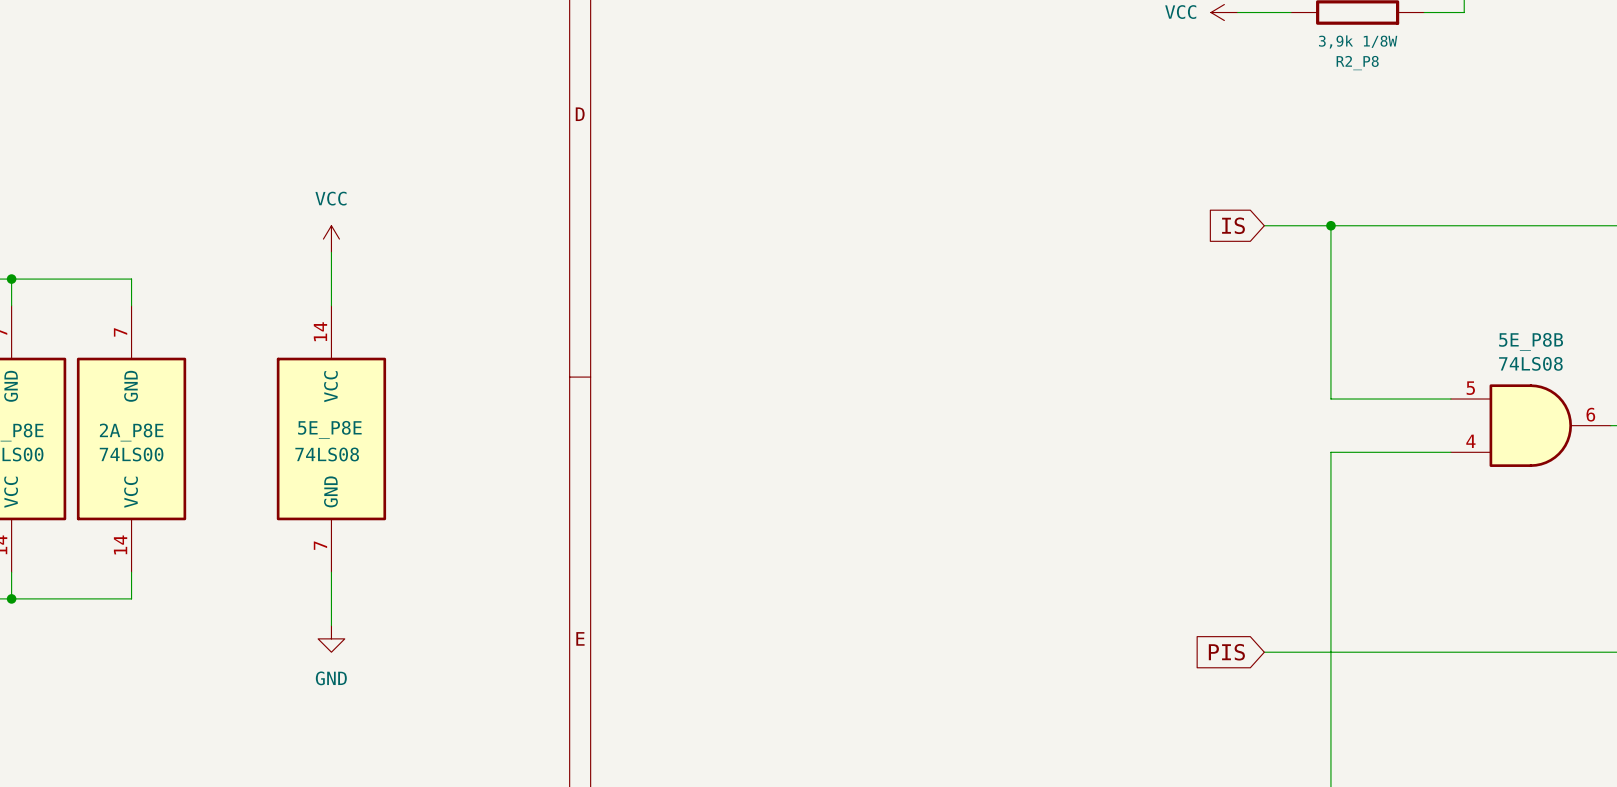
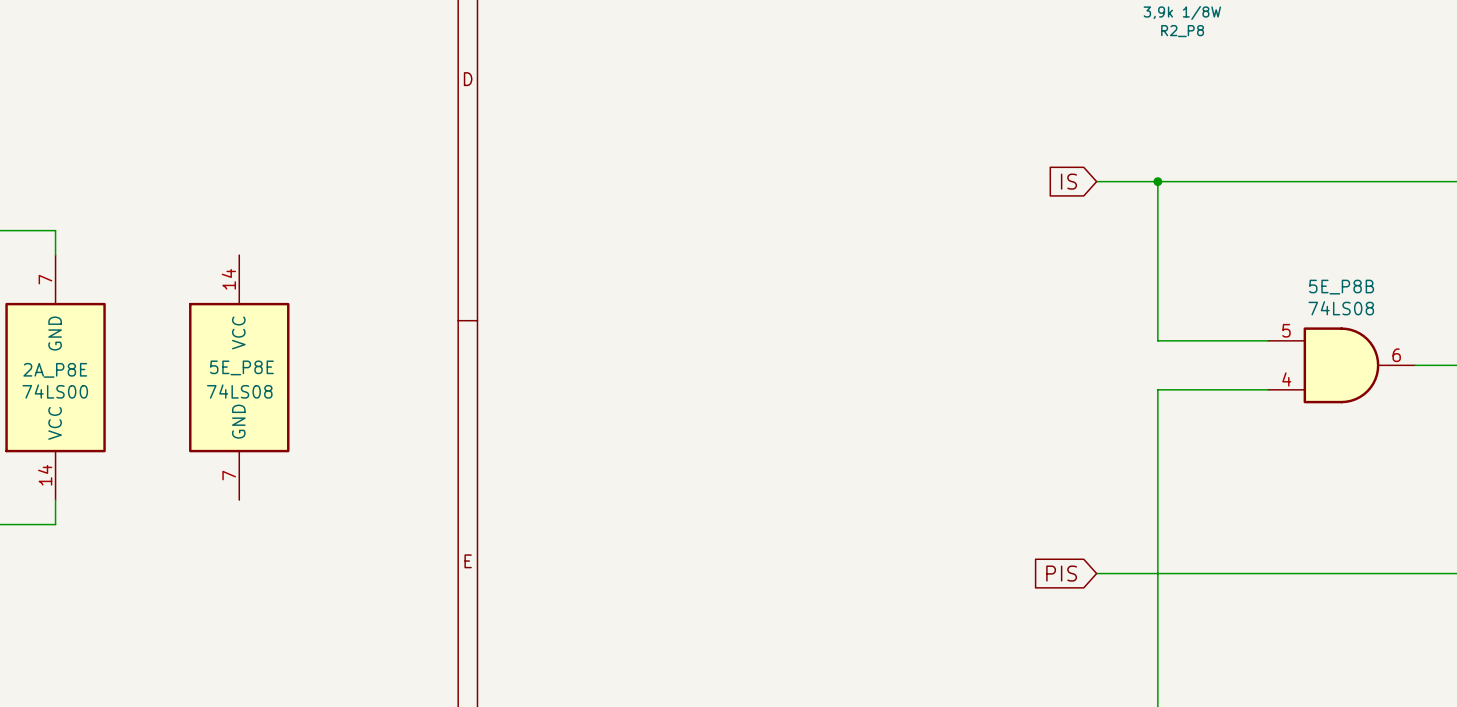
power symbol: VCC (331, 239) -> none
wire: (331, 252) (331, 305) -> none
wire: (331, 572) (331, 625) -> none
power symbol: GND (331, 638) -> none

